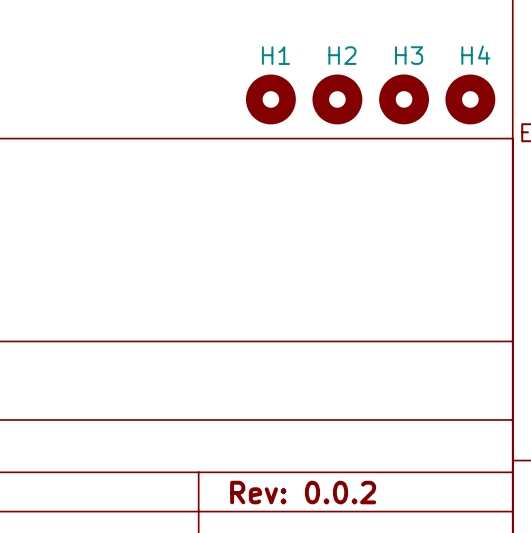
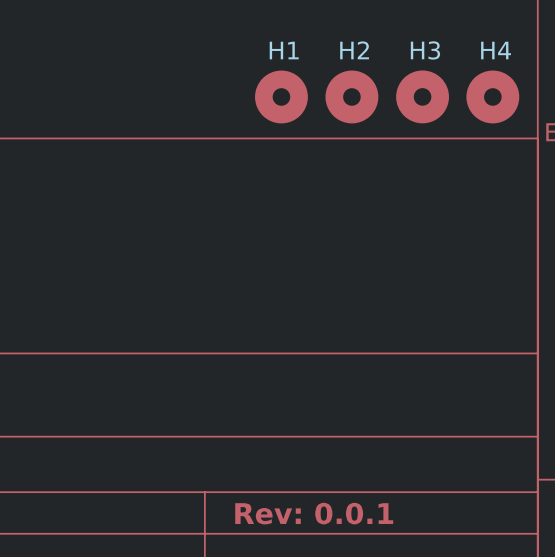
title block: Rev: 0.0.2 (303, 492) -> Rev: 0.0.1 (314, 513)

